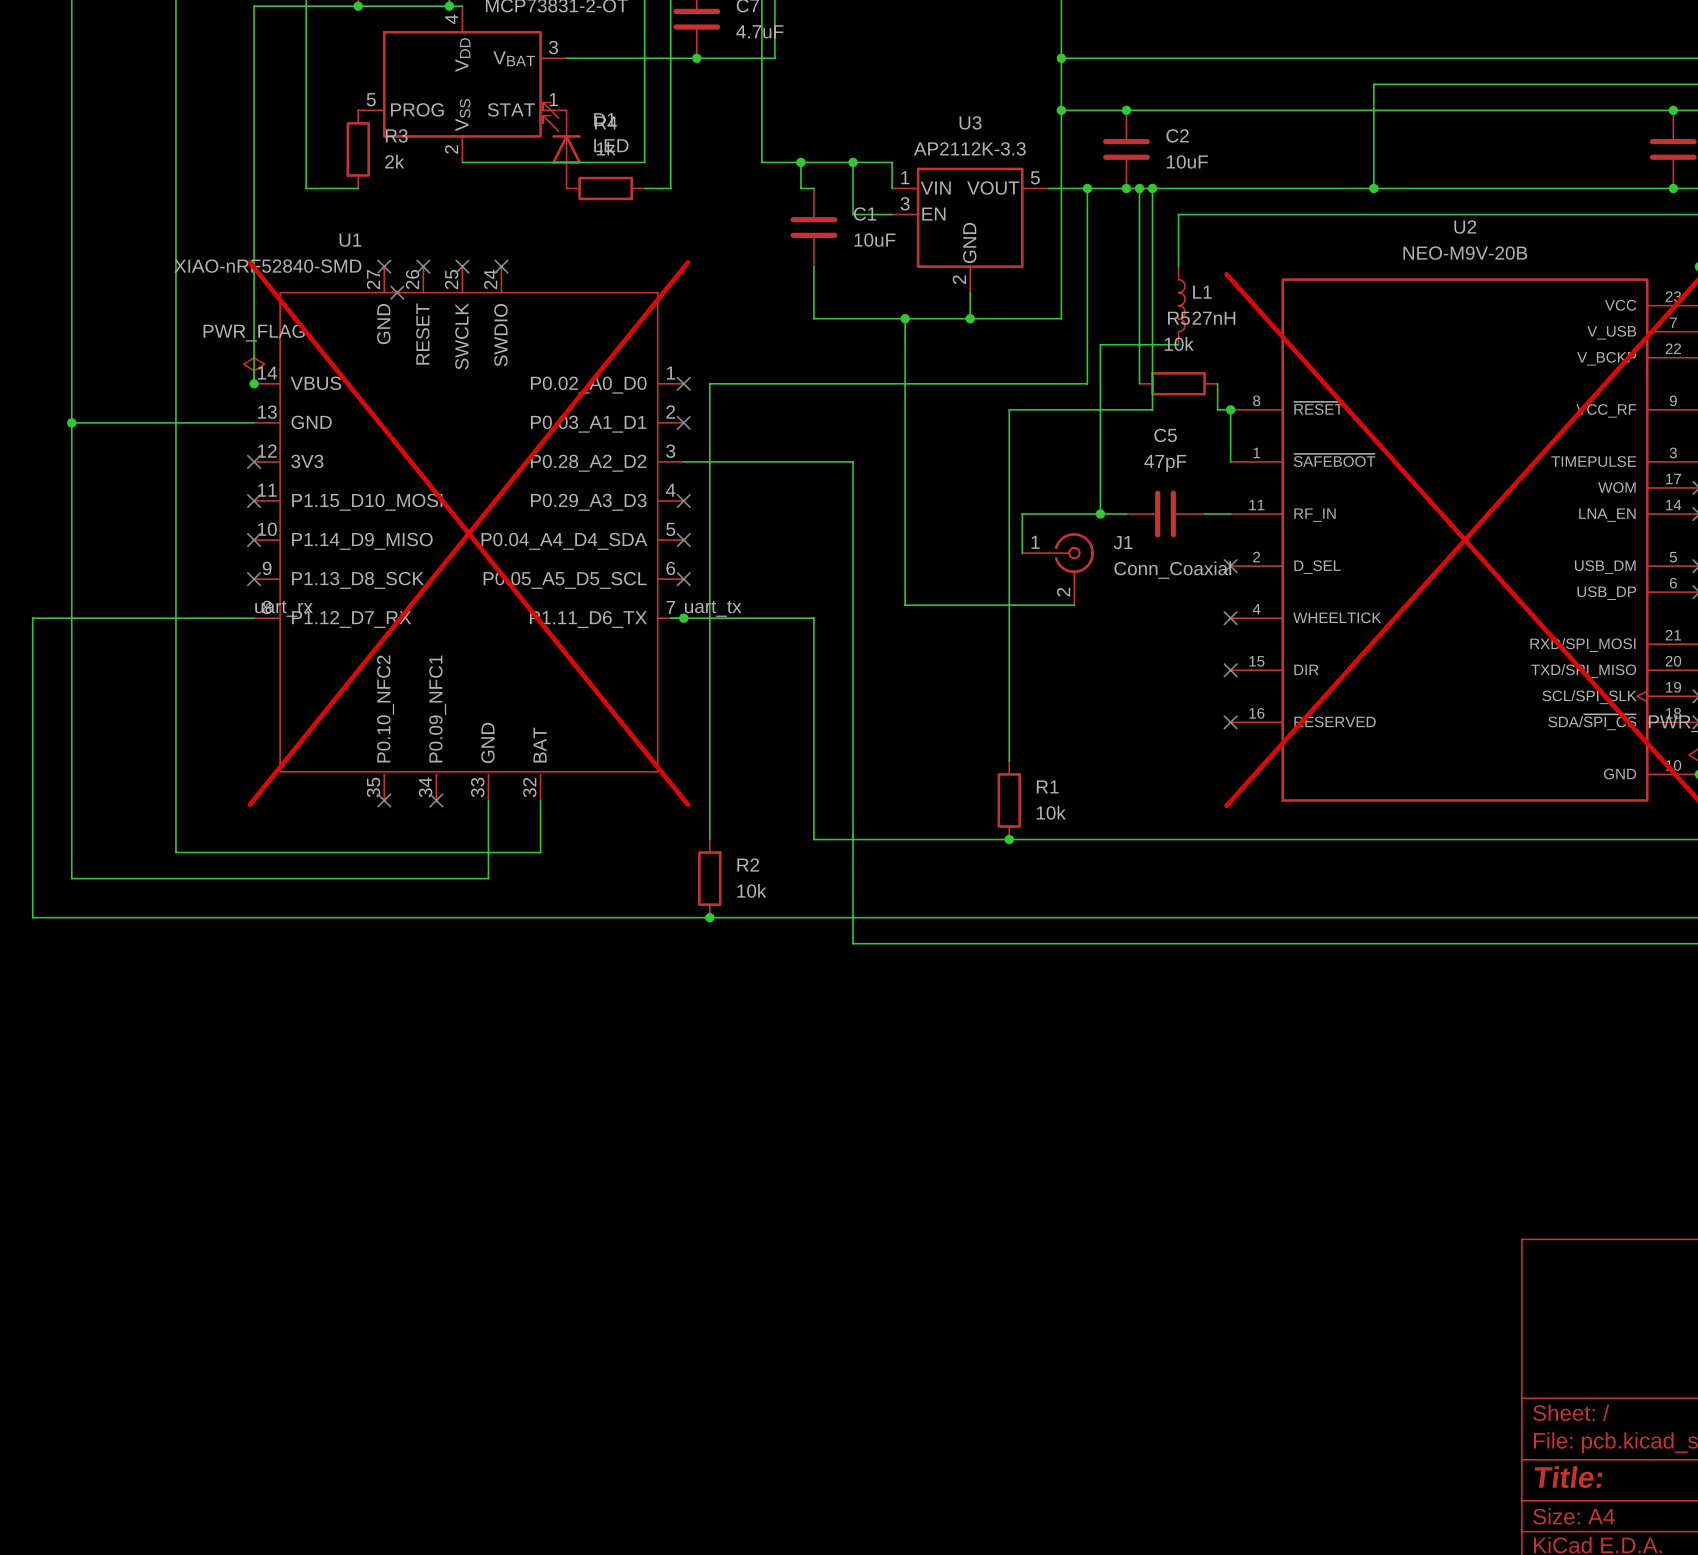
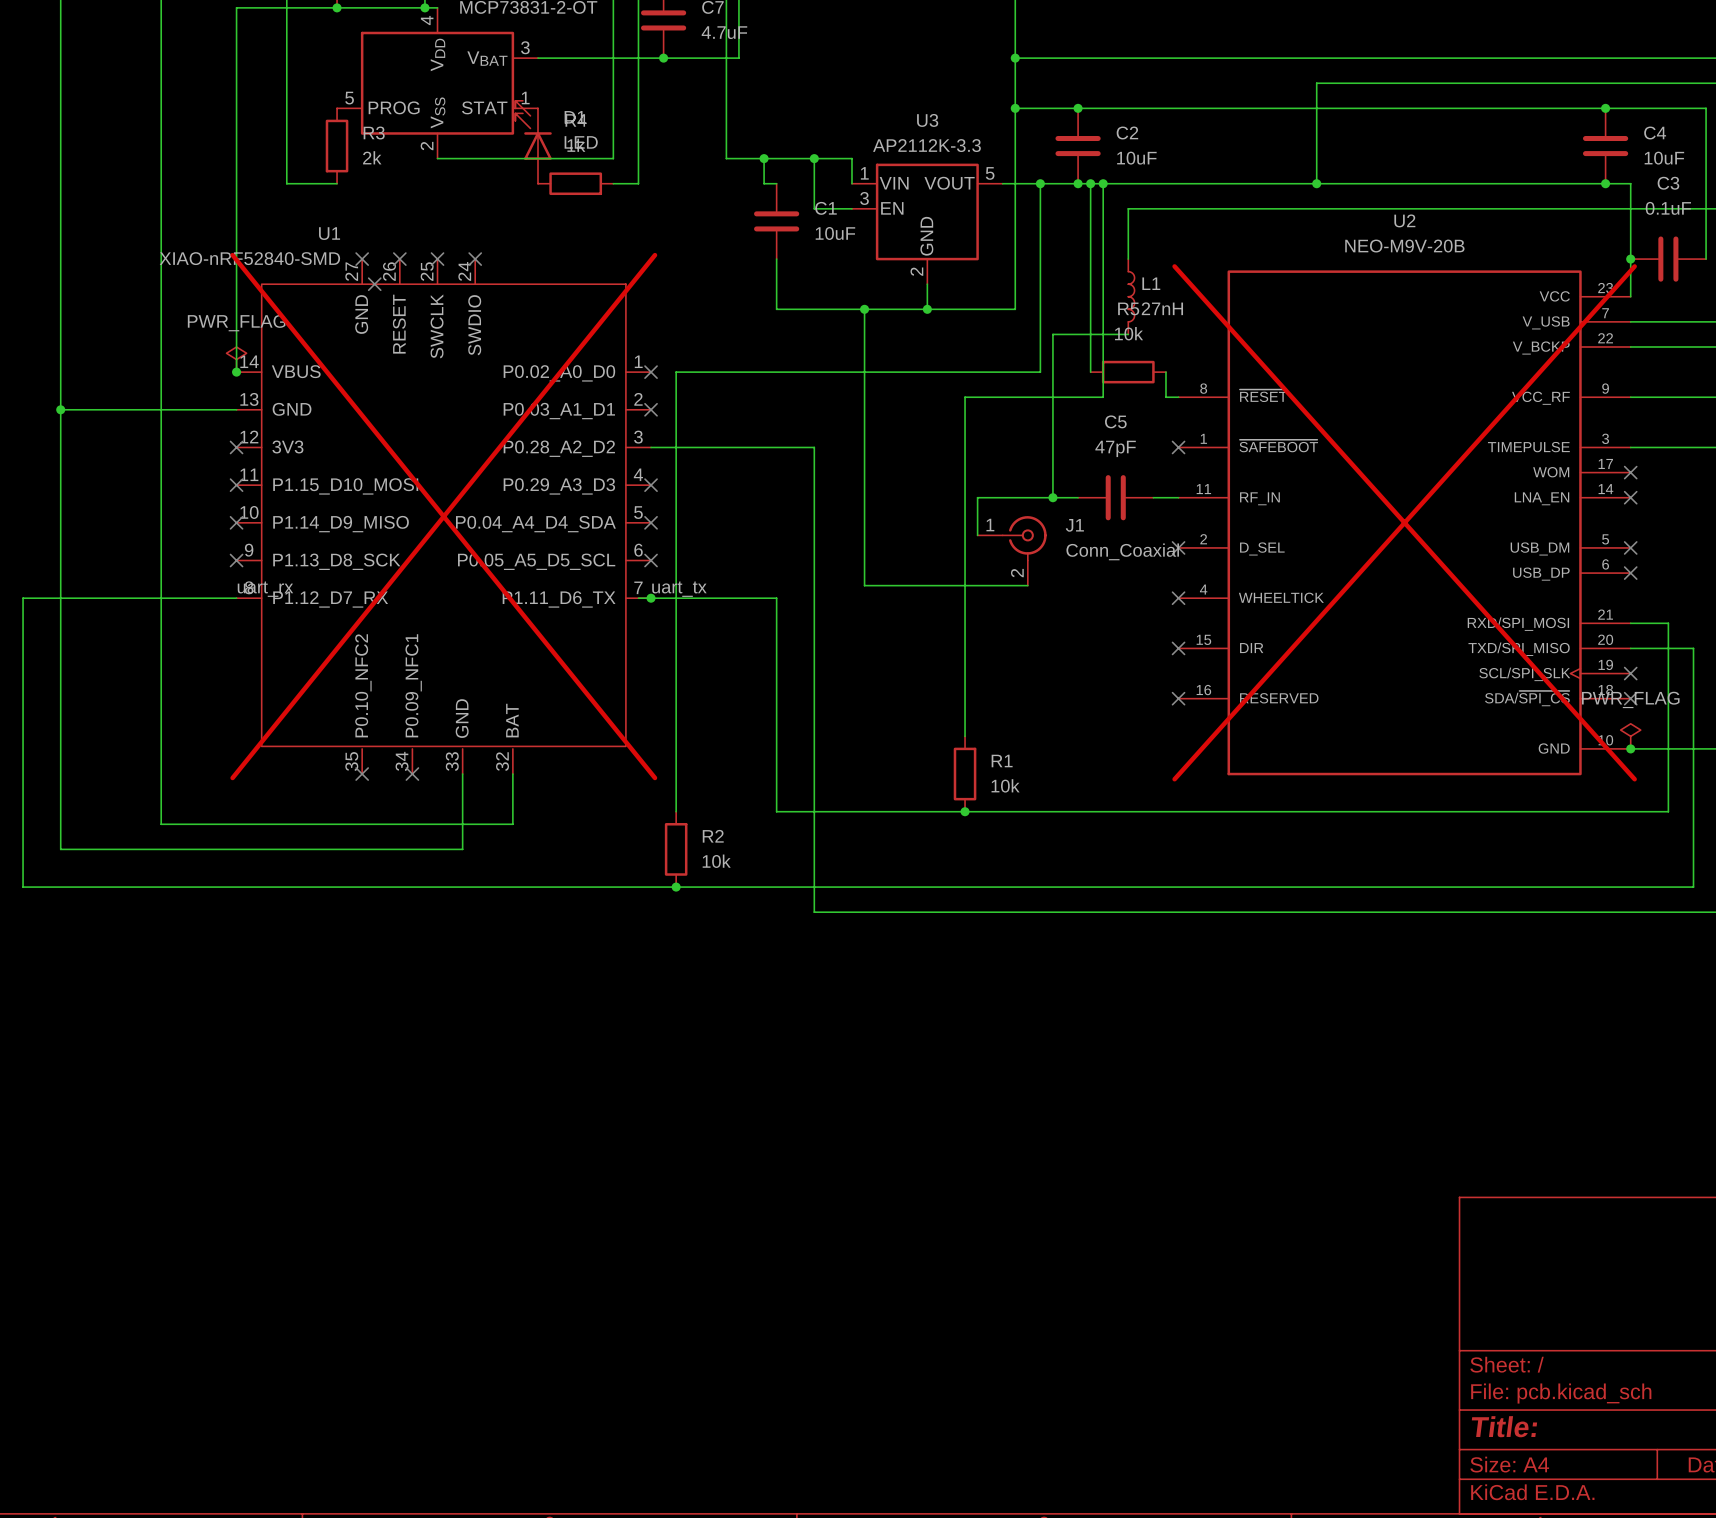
wire: (1230, 409) (1230, 461) -> none
junction: (1230, 409) -> none
no-connect mark: none -> (1178, 447)

